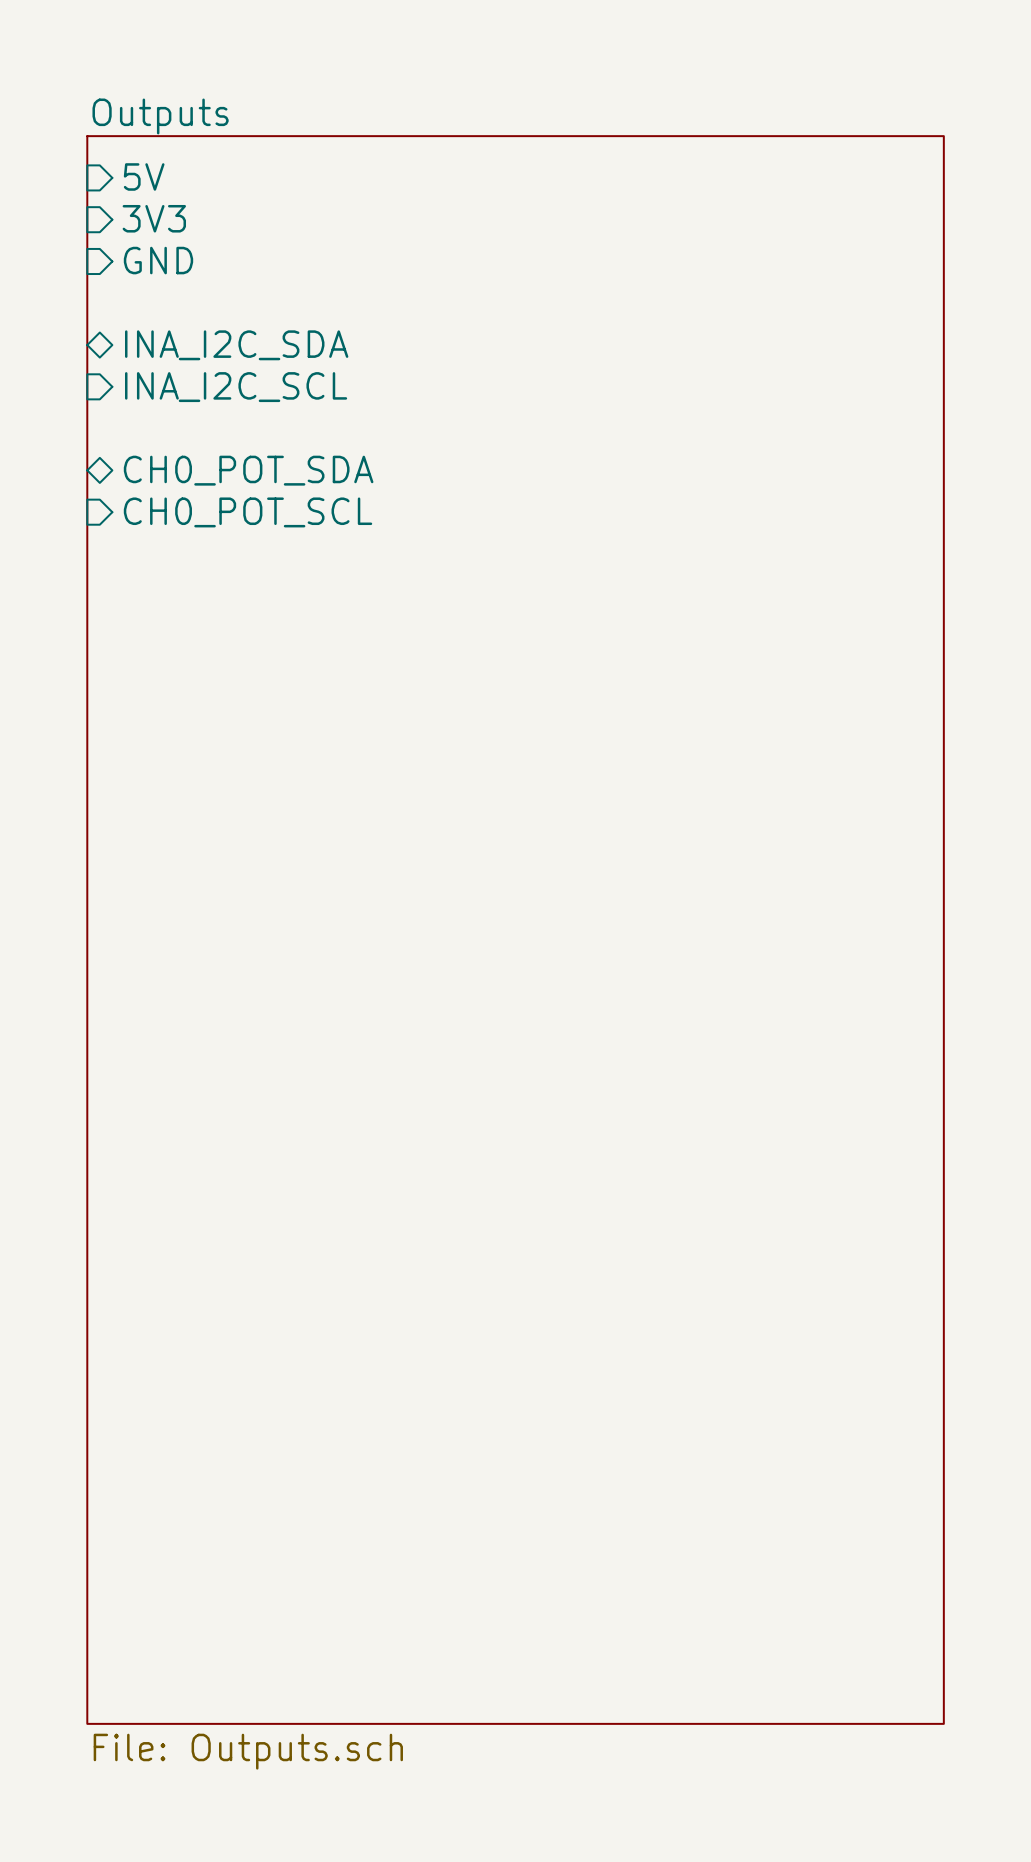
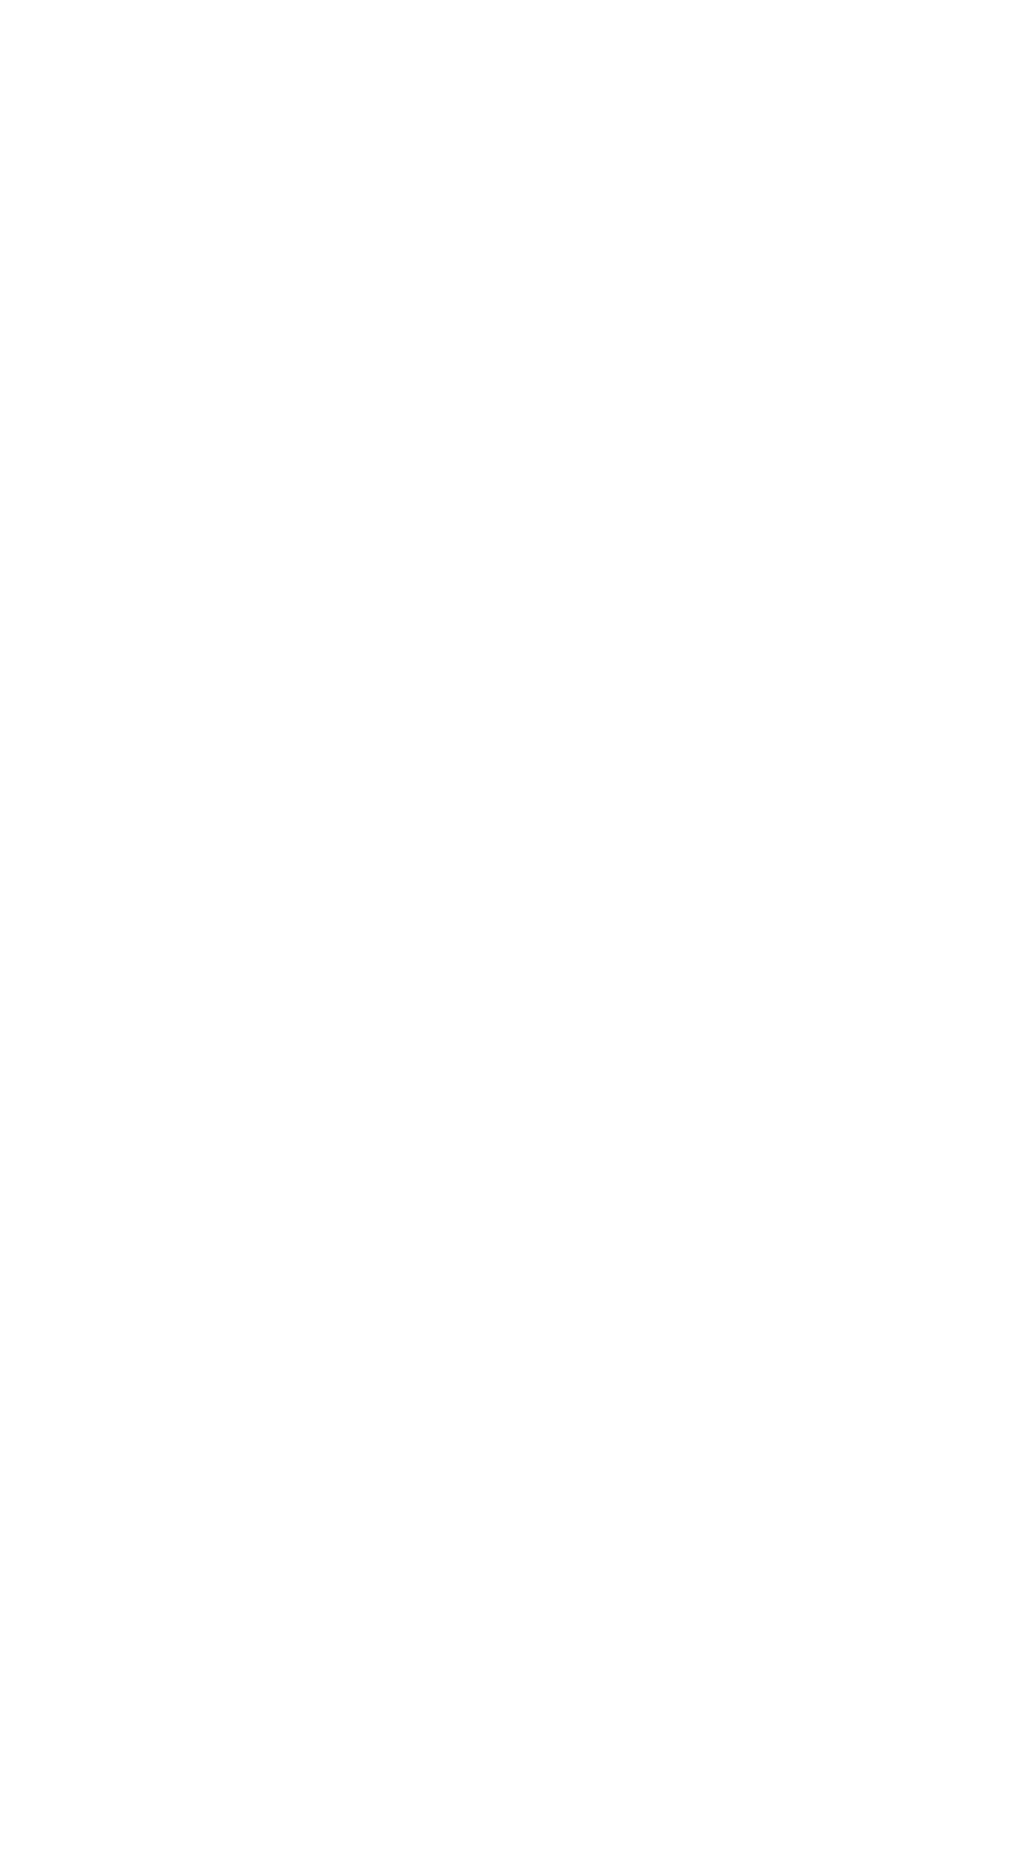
sheet pin: 5V (144, 176) -> none
sheet pin: 3V3 (154, 218) -> none
sheet pin: GND (158, 260) -> none
sheet pin: INA_I2C_SDA (236, 345) -> none
sheet pin: INA_I2C_SCL (236, 387) -> none
sheet pin: CH0_POT_SDA (248, 470) -> none
sheet pin: CH0_POT_SCL (248, 512) -> none
sheet Outputs: File: Outputs.sch (515, 930) -> none

